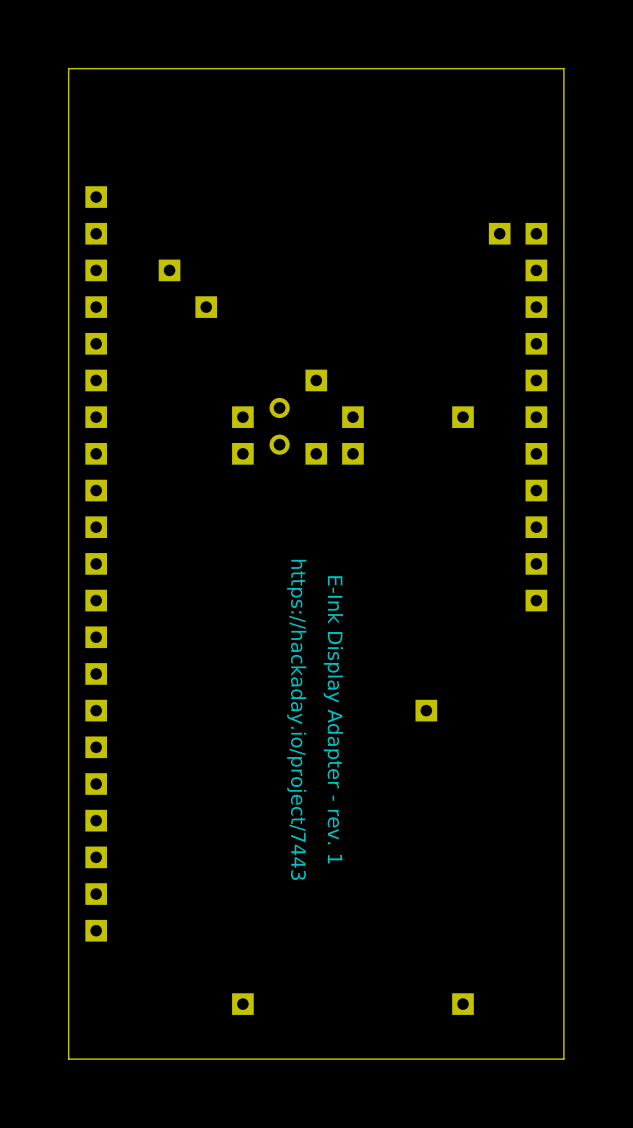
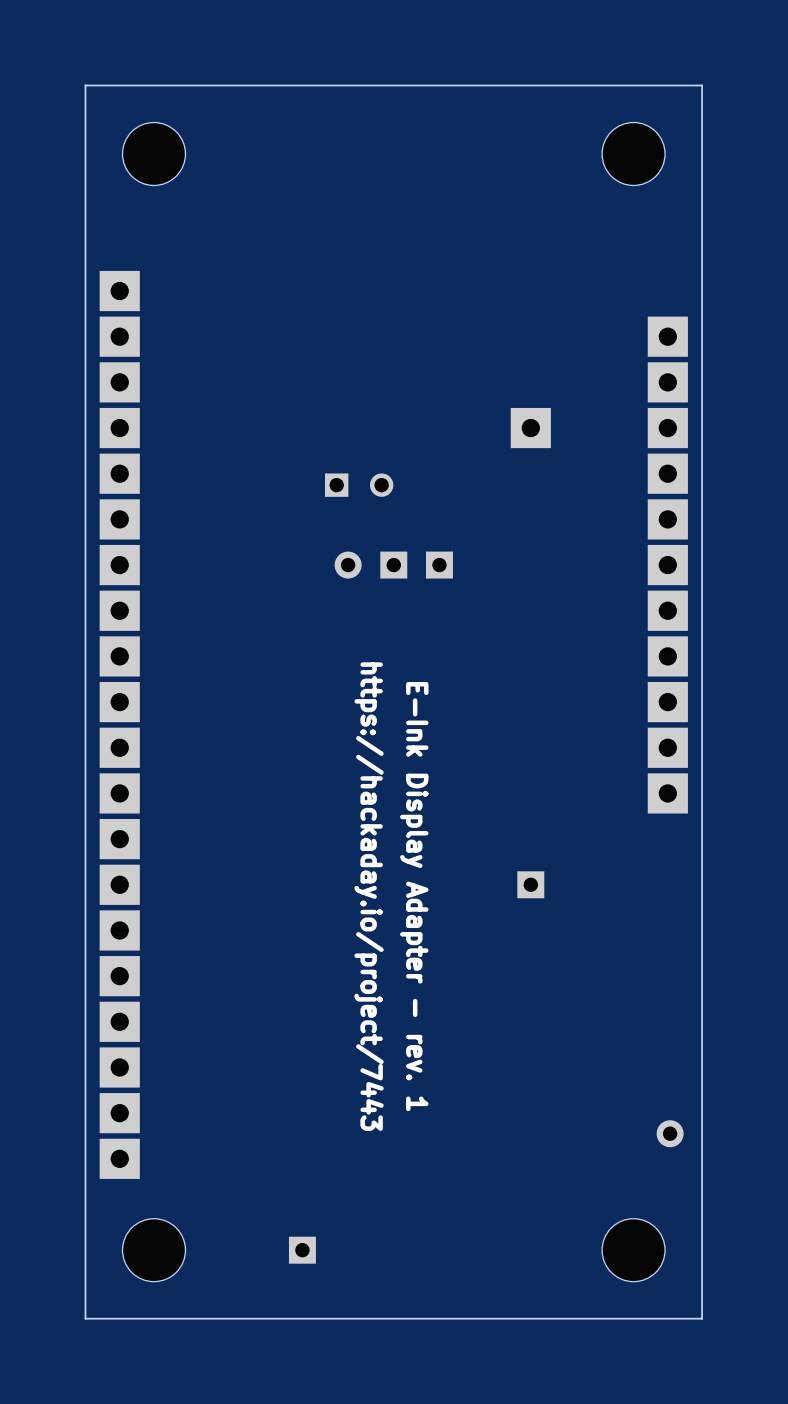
part: none -> (154, 154)
part: none -> (633, 154)
part: (96, 197) -> none
part footprint: [85, 222, 108, 245] -> [99, 270, 140, 312]
part: (499, 233) -> none
part: (536, 233) -> none
part footprint: [85, 259, 108, 282] -> [99, 316, 140, 357]
part footprint: [525, 259, 548, 282] -> [647, 316, 688, 357]
part: (169, 270) -> none
part footprint: [85, 296, 108, 318] -> [99, 362, 140, 403]
part footprint: [525, 296, 548, 318] -> [647, 362, 688, 403]
part: (206, 307) -> none
part footprint: [85, 332, 108, 355] -> [99, 407, 140, 449]
part footprint: [525, 332, 548, 355] -> [647, 407, 688, 449]
part: none -> (530, 428)
part footprint: [85, 369, 108, 392] -> [99, 453, 140, 494]
part footprint: [525, 369, 548, 392] -> [647, 453, 688, 494]
part: (316, 380) -> none
part: none -> (359, 485)
part footprint: [85, 406, 108, 428] -> [99, 499, 140, 540]
part footprint: [525, 406, 548, 428] -> [647, 499, 688, 540]
part: (242, 417) -> none
part: (352, 417) -> none
part: (463, 417) -> none
part: (279, 426) -> none
part footprint: [85, 443, 108, 465] -> [99, 544, 140, 586]
part footprint: [525, 443, 548, 465] -> [647, 544, 688, 586]
part: (242, 453) -> none
part: none -> (348, 565)
part footprint: [85, 479, 108, 502] -> [99, 590, 140, 631]
part footprint: [525, 479, 548, 502] -> [647, 590, 688, 631]
part footprint: [85, 516, 108, 539] -> [99, 636, 140, 677]
part footprint: [525, 516, 548, 539] -> [647, 636, 688, 677]
part footprint: [85, 553, 108, 575] -> [99, 681, 140, 723]
part footprint: [525, 553, 548, 575] -> [647, 681, 688, 723]
part footprint: [85, 589, 108, 612] -> [99, 727, 140, 768]
part footprint: [525, 589, 548, 612] -> [647, 727, 688, 768]
part footprint: [85, 626, 108, 649] -> [99, 773, 140, 814]
part: none -> (667, 793)
part footprint: [85, 663, 108, 685] -> [99, 819, 140, 860]
part footprint: [85, 699, 108, 722] -> [99, 864, 140, 905]
part footprint: [85, 736, 108, 759] -> [99, 910, 140, 951]
part footprint: [85, 773, 108, 795] -> [99, 956, 140, 997]
part footprint: [85, 809, 108, 832] -> [99, 1001, 140, 1042]
part footprint: [85, 846, 108, 869] -> [99, 1047, 140, 1088]
part footprint: [85, 883, 108, 905] -> [99, 1093, 140, 1134]
part: none -> (670, 1133)
part footprint: [85, 919, 108, 942] -> [99, 1138, 140, 1179]
part: none -> (154, 1250)
part: (463, 1004) -> none
part: none -> (633, 1250)

